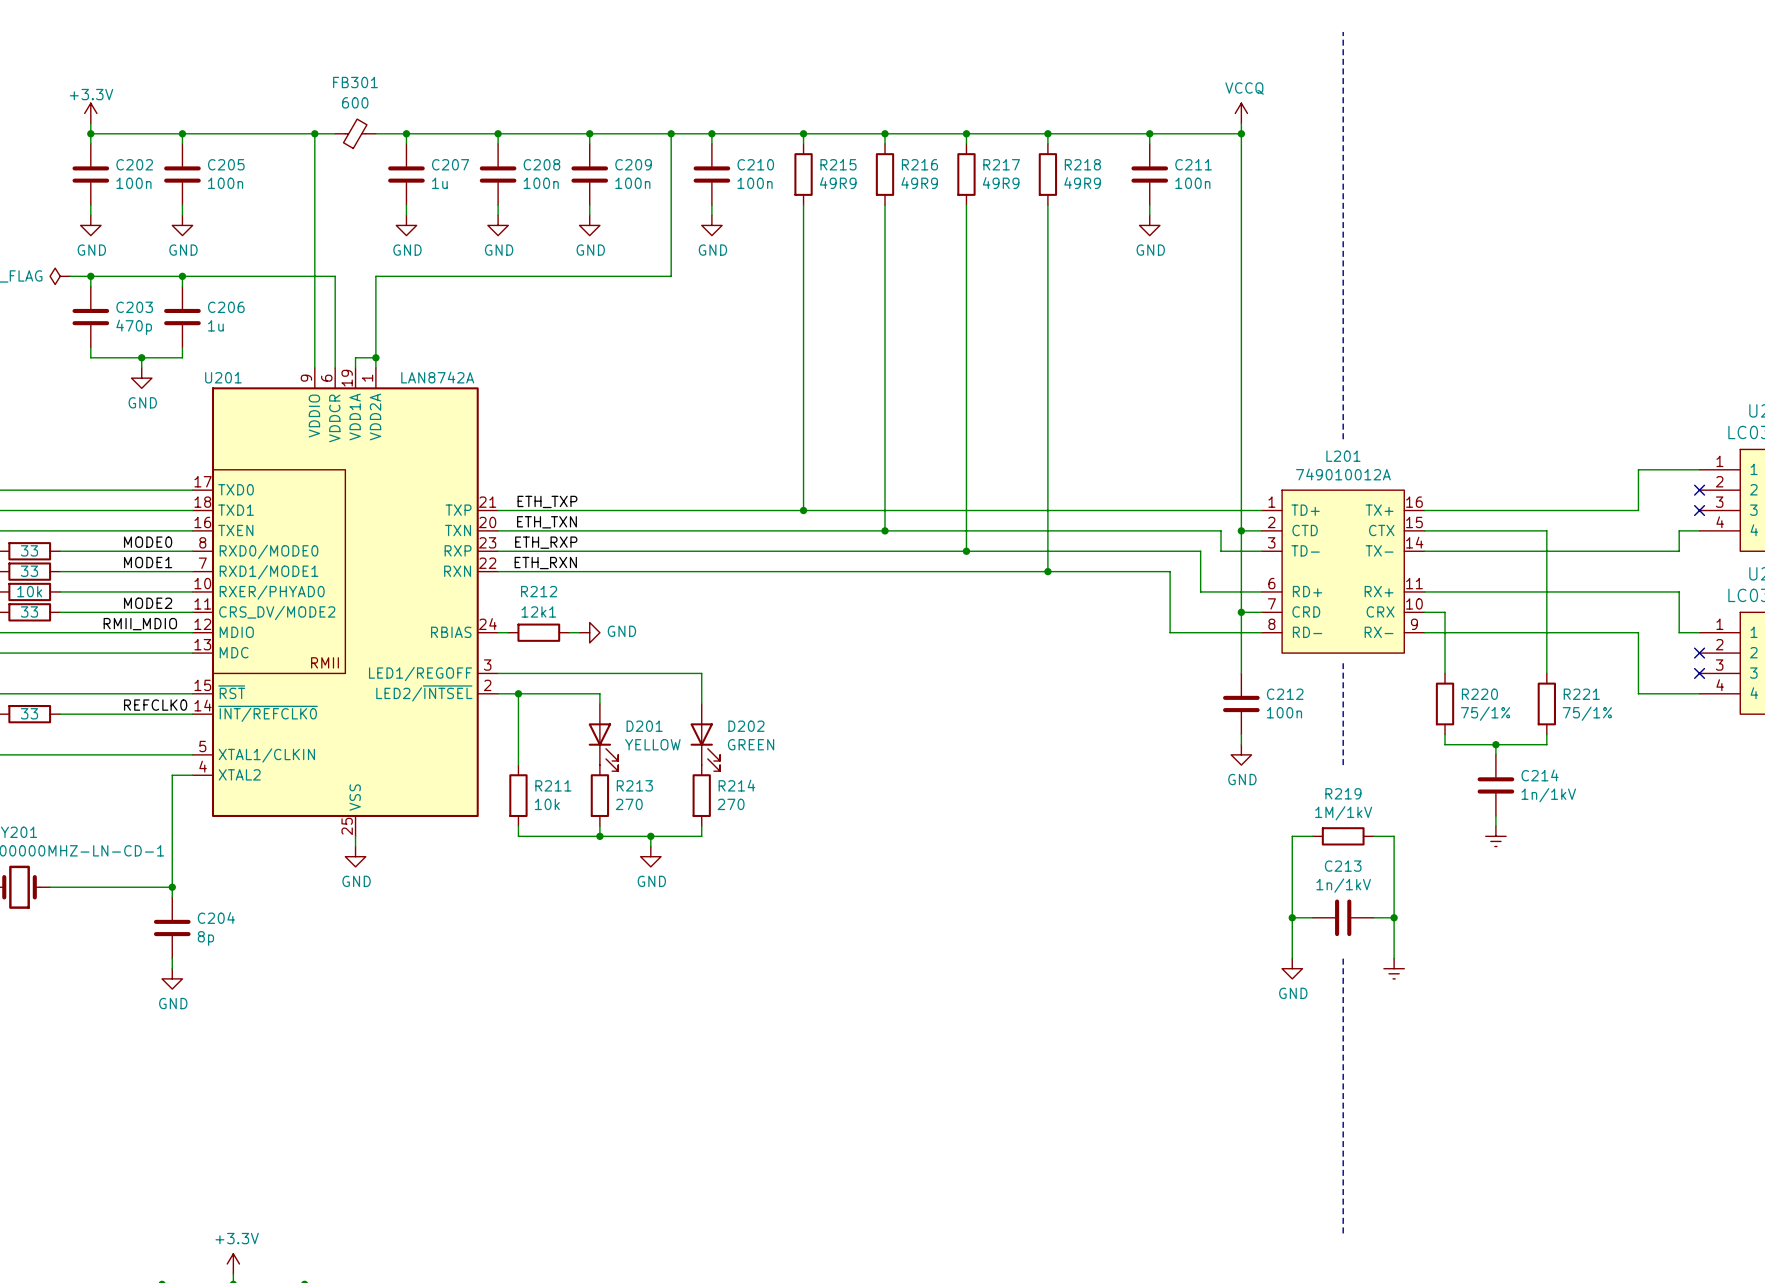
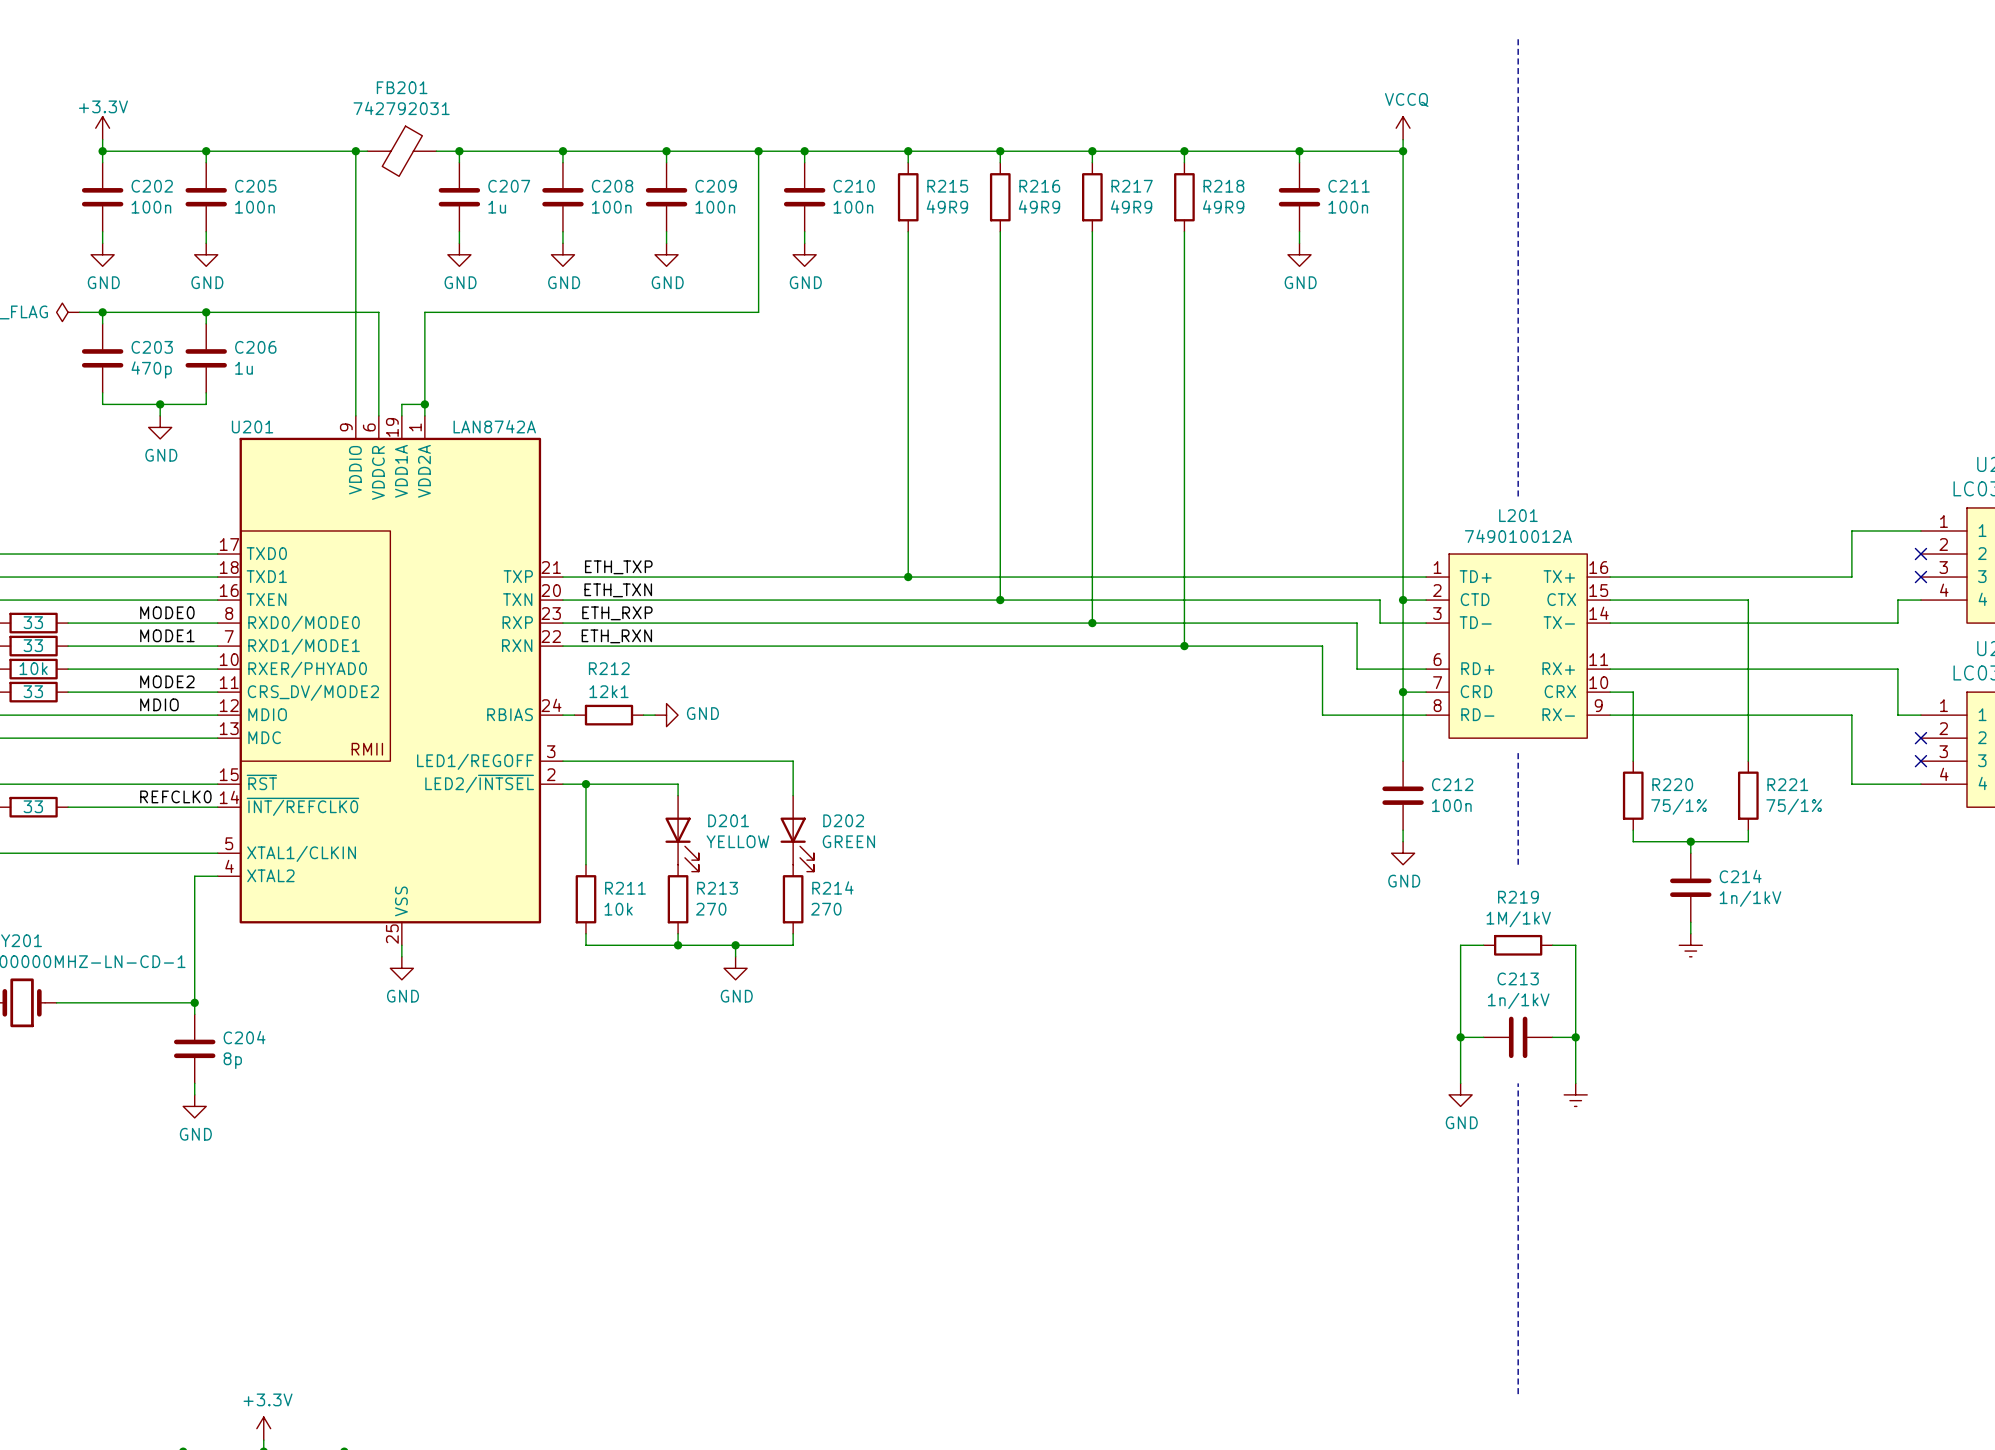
FB301: 600 (355, 133) -> none
FB201: none -> 742792031 (401, 151)
label: RMII_MDIO (140, 624) -> MDIO (159, 704)

